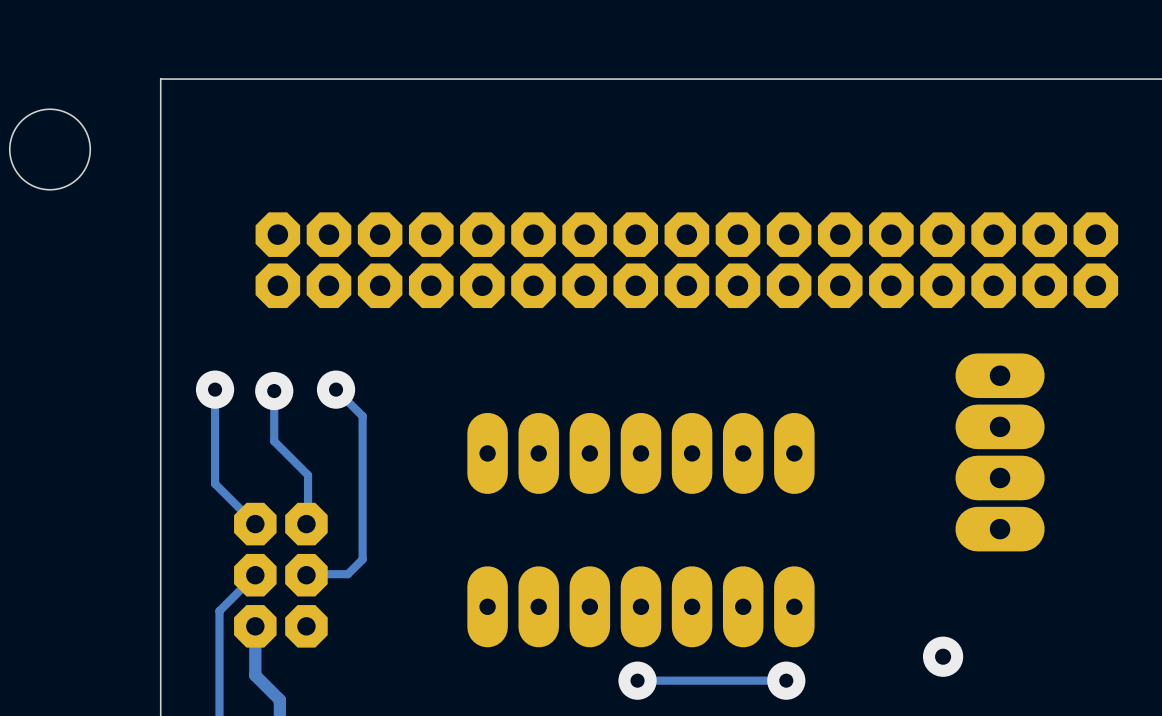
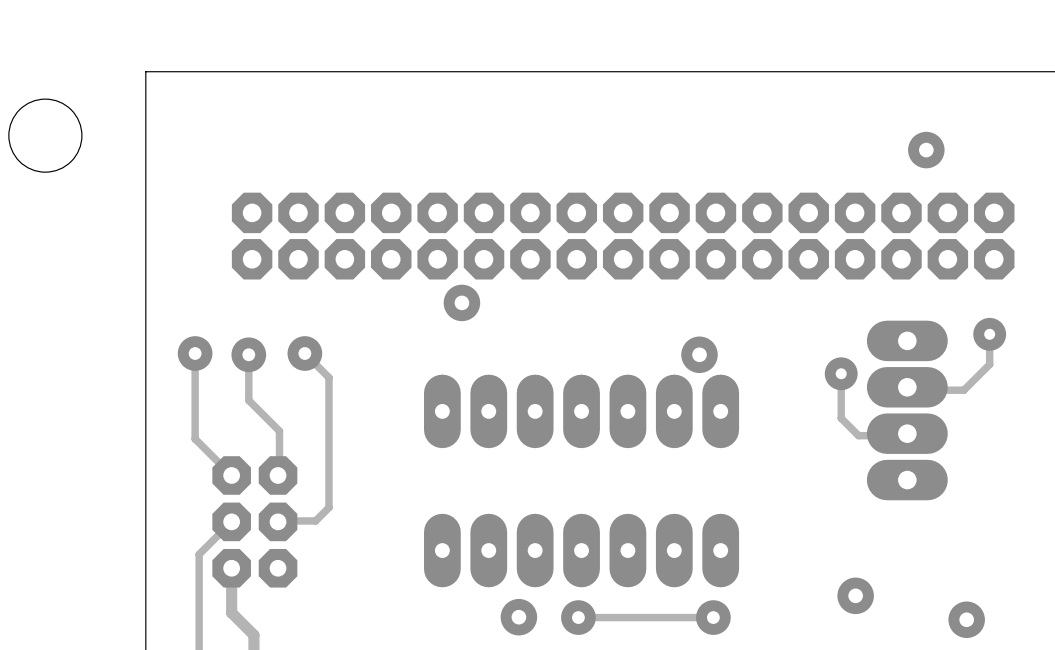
via: none -> (926, 150)
via: none -> (461, 302)
track: none -> (989, 334) (989, 364) (963, 390) (910, 390) (910, 387)
via: none -> (989, 334)
via: none -> (699, 354)
track: none -> (841, 373) (841, 418) (858, 435) (910, 434)
via: none -> (841, 373)
via: none -> (518, 617)
via: none -> (966, 619)

